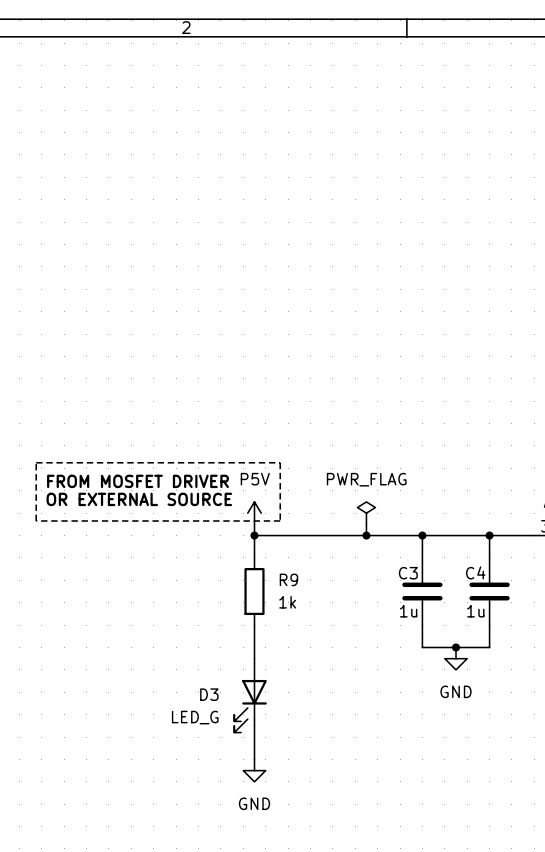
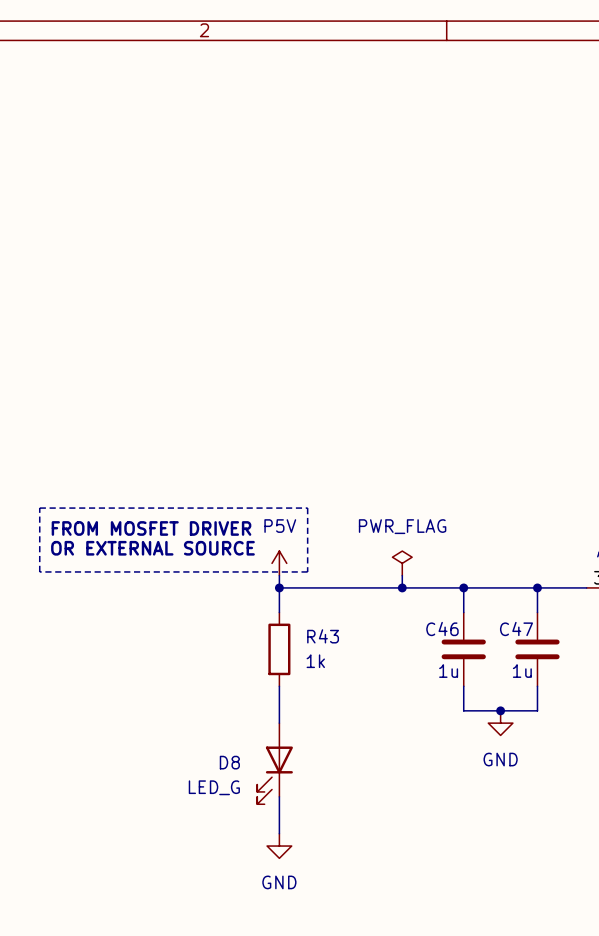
C4 name: C4 (475, 572) -> C47 (516, 628)
C3 name: C3 (408, 573) -> C46 (442, 628)
R9 name: R9 (288, 579) -> R43 (323, 636)
D3 name: D3 (209, 694) -> D8 (229, 762)

